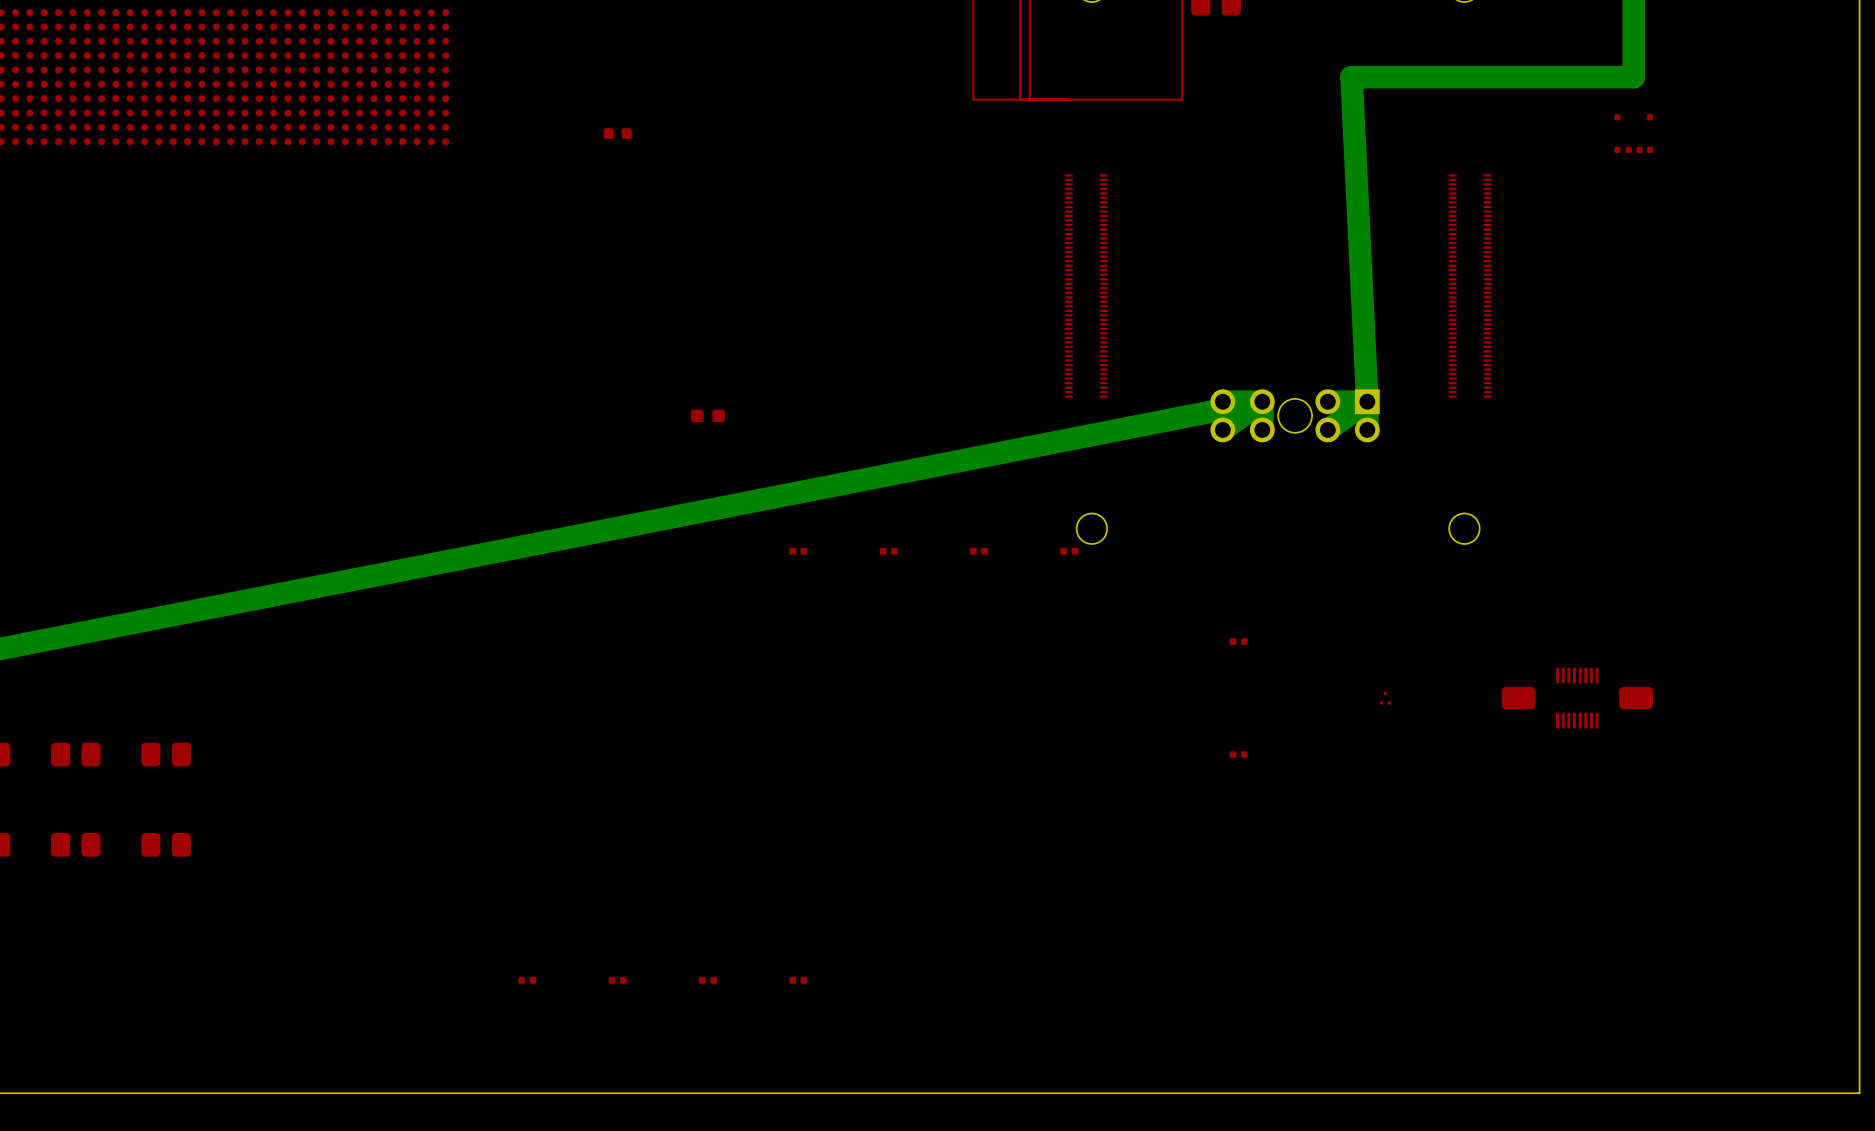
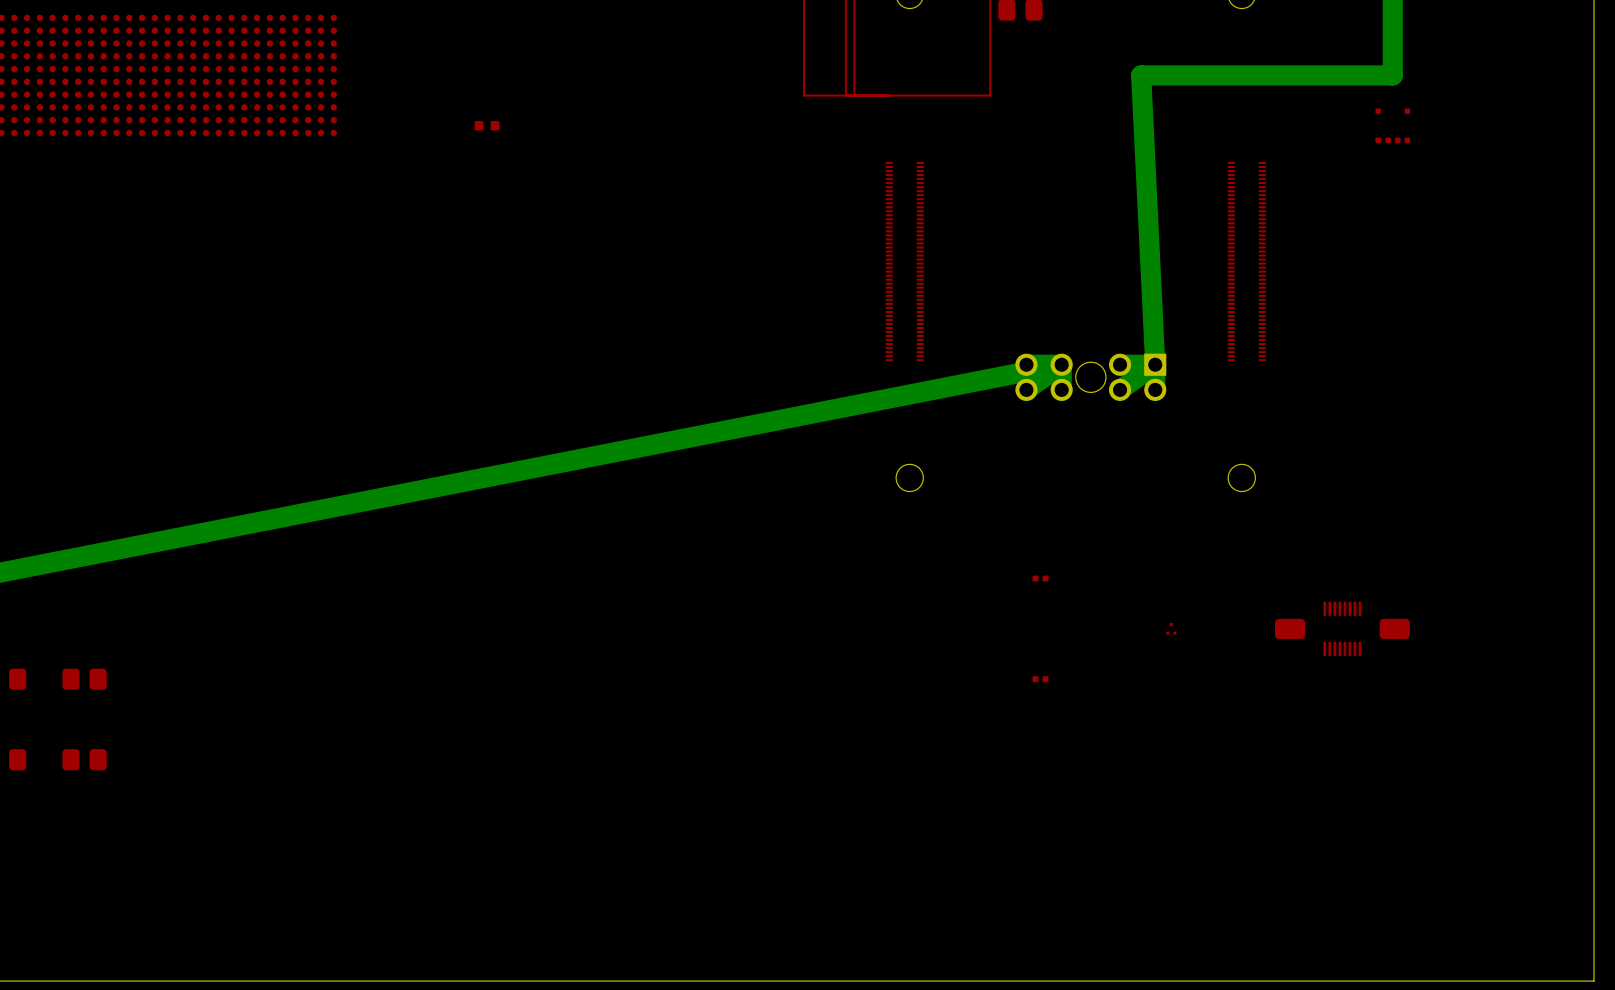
part: (708, 415) -> none
part: (798, 551) -> none
part: (888, 551) -> none
part: (978, 551) -> none
part: (1069, 551) -> none
part: (527, 980) -> none
part: (617, 980) -> none
part: (708, 980) -> none
part: (798, 980) -> none

